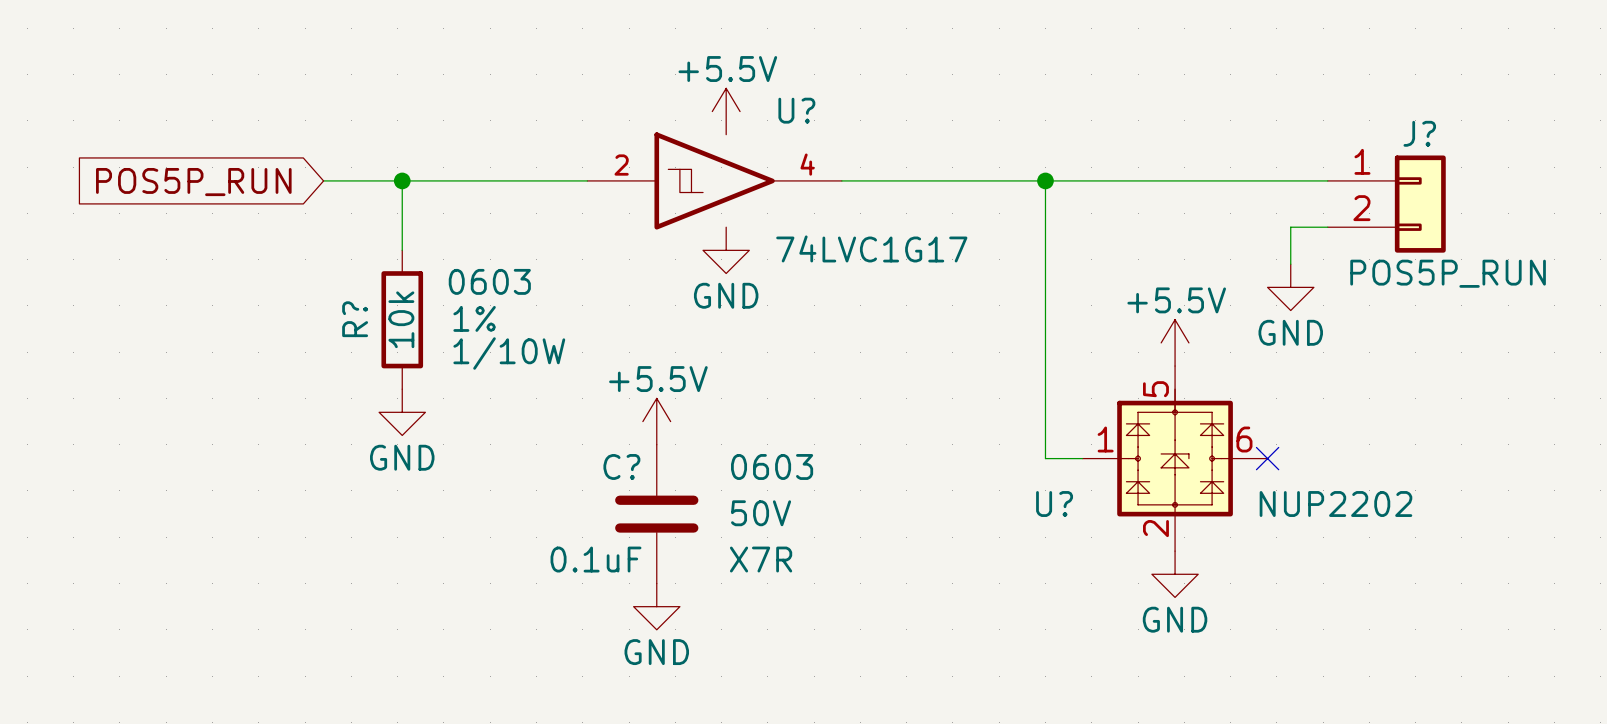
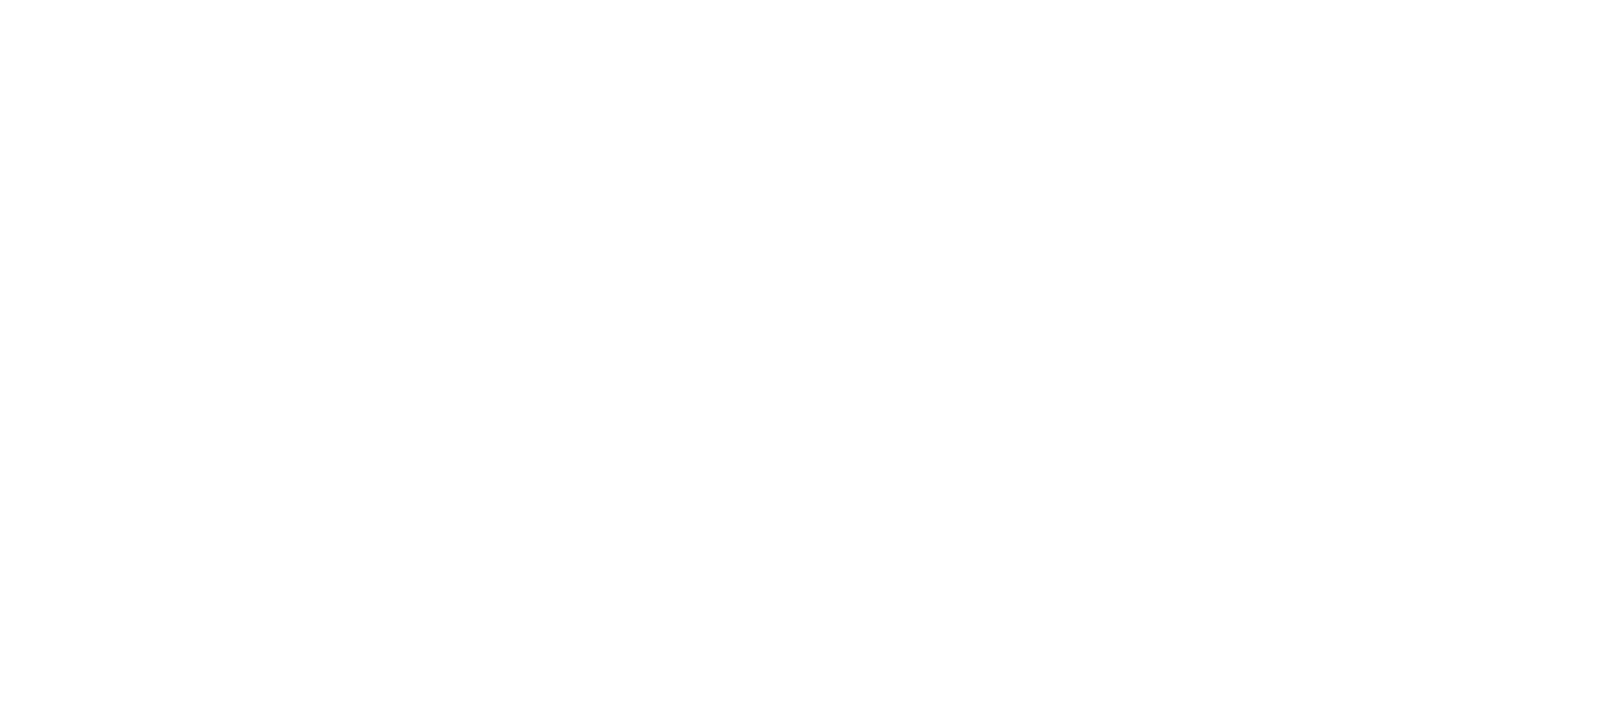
power symbol: +5.5V (726, 111) -> none
wire: (323, 180) (587, 180) -> none
wire: (402, 180) (402, 250) -> none
junction: (402, 180) -> none
U?: 74LVC1G17 (714, 180) -> none
wire: (841, 180) (1327, 180) -> none
wire: (1045, 180) (1045, 458) (1082, 458) -> none
junction: (1045, 180) -> none
global label: POS5P_RUN (193, 182) -> none
J?: POS5P_RUN (1386, 204) -> none
wire: (1327, 227) (1290, 227) (1290, 264) -> none
power symbol: GND (726, 250) -> none
power symbol: GND (1290, 287) -> none
R?: 10k (402, 319) -> none
power symbol: +5.5V (1175, 342) -> none
power symbol: GND (402, 412) -> none
power symbol: +5.5V (656, 421) -> none
U?: NUP2202 (1175, 458) -> none
no-connect mark: (1267, 458) -> none
C?: 0.1uF (656, 514) -> none
power symbol: GND (1175, 574) -> none
power symbol: GND (656, 606) -> none

